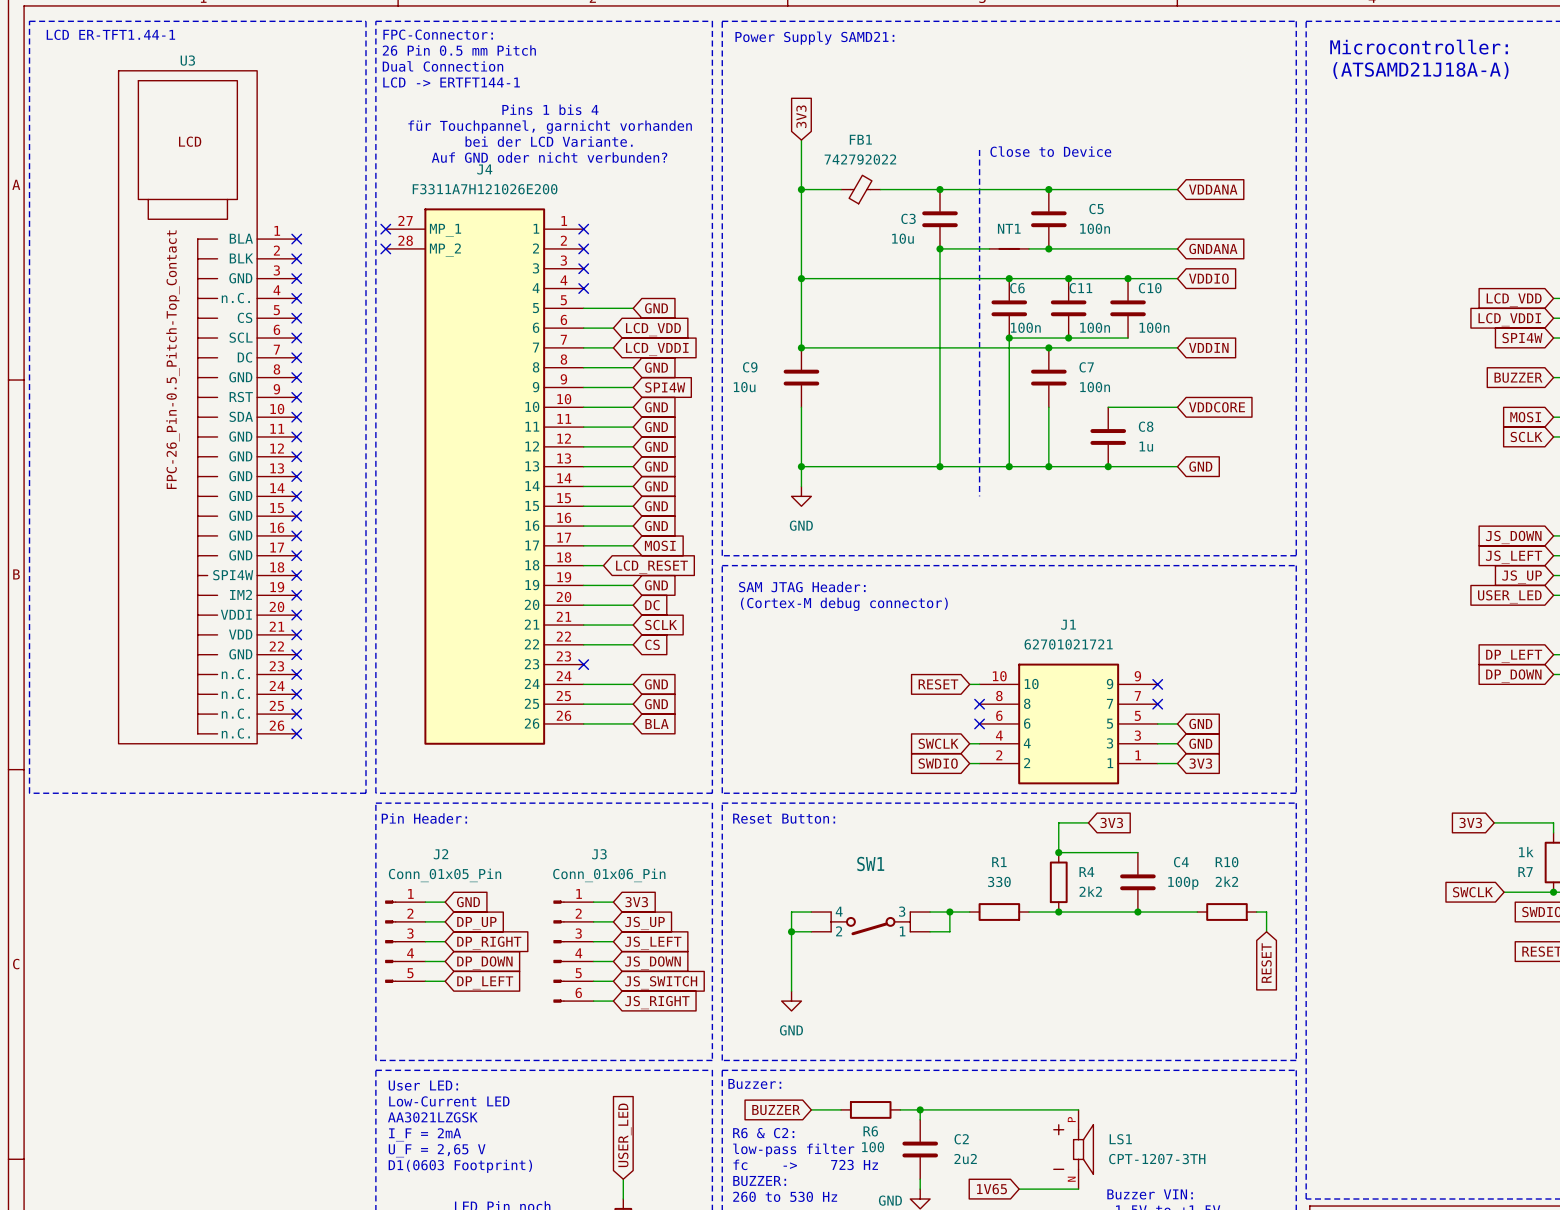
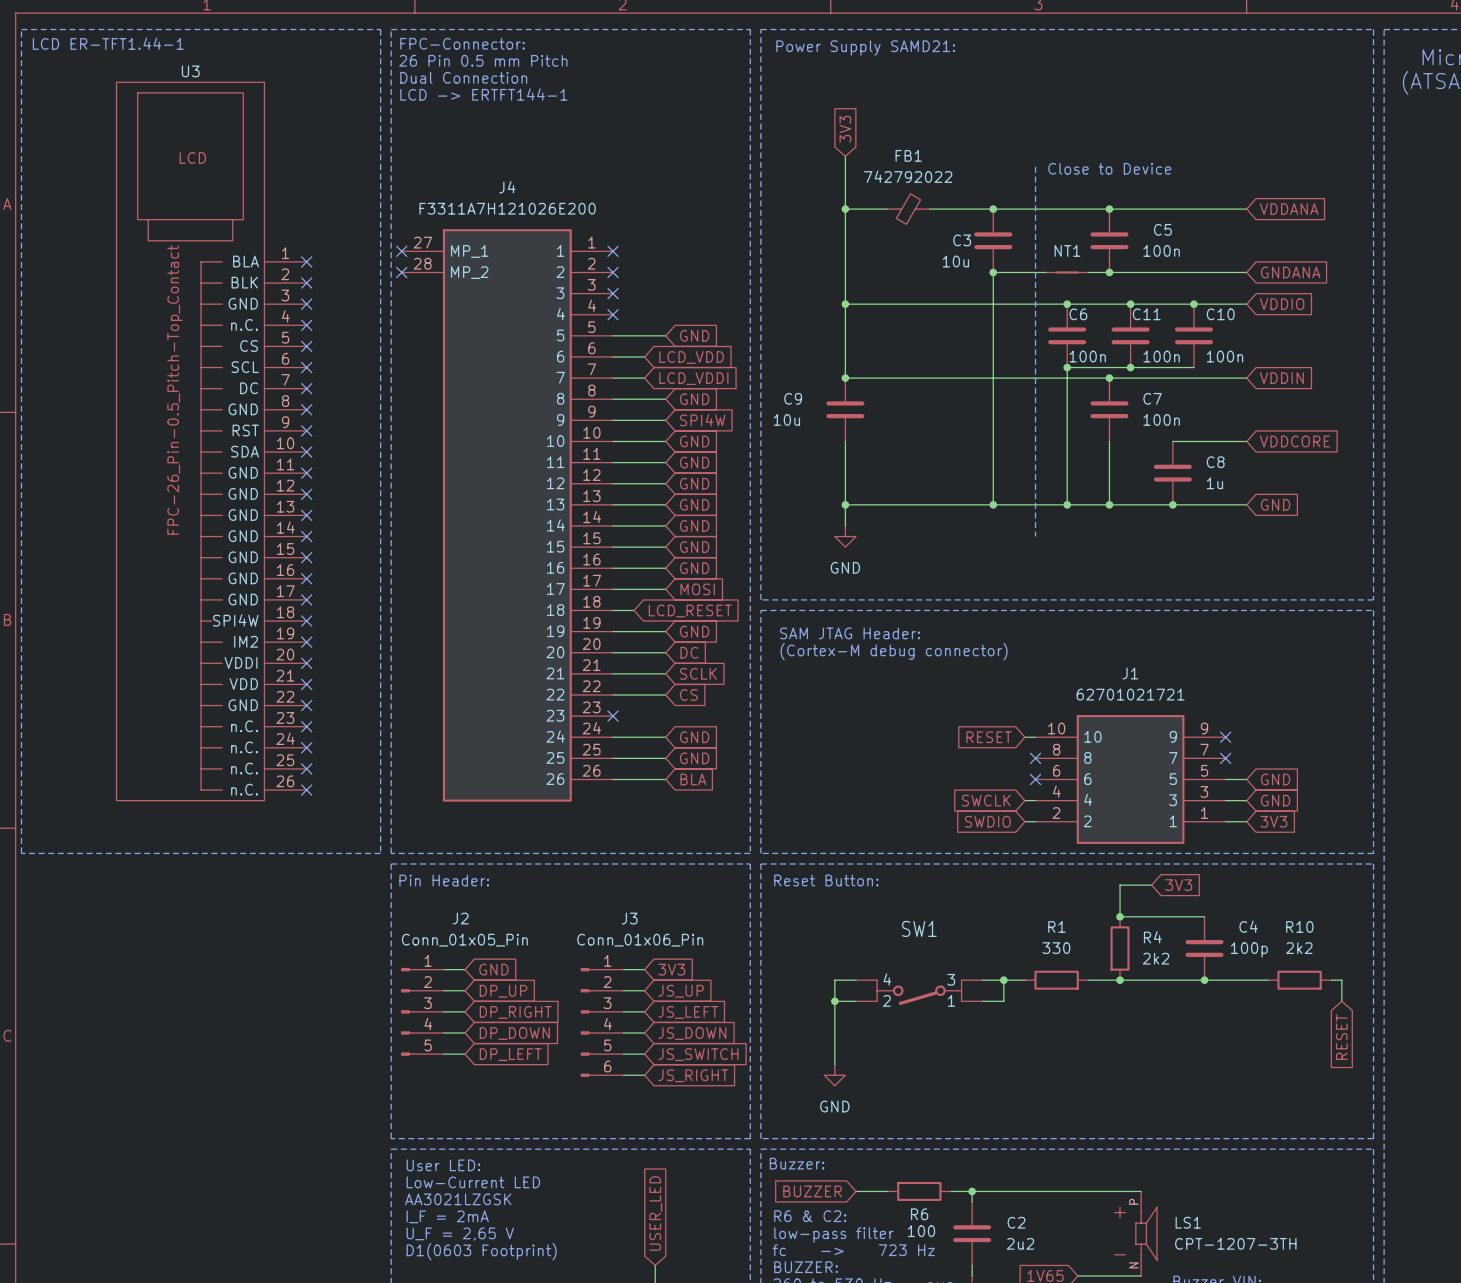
text: Pins 1 bis 4 (550, 109) -> none
text: für Touchpannel, garnicht vorhanden (550, 127) -> none
text: bei der LCD Variante. (549, 141) -> none
text: Auf GND oder nicht verbunden? (549, 157) -> none

